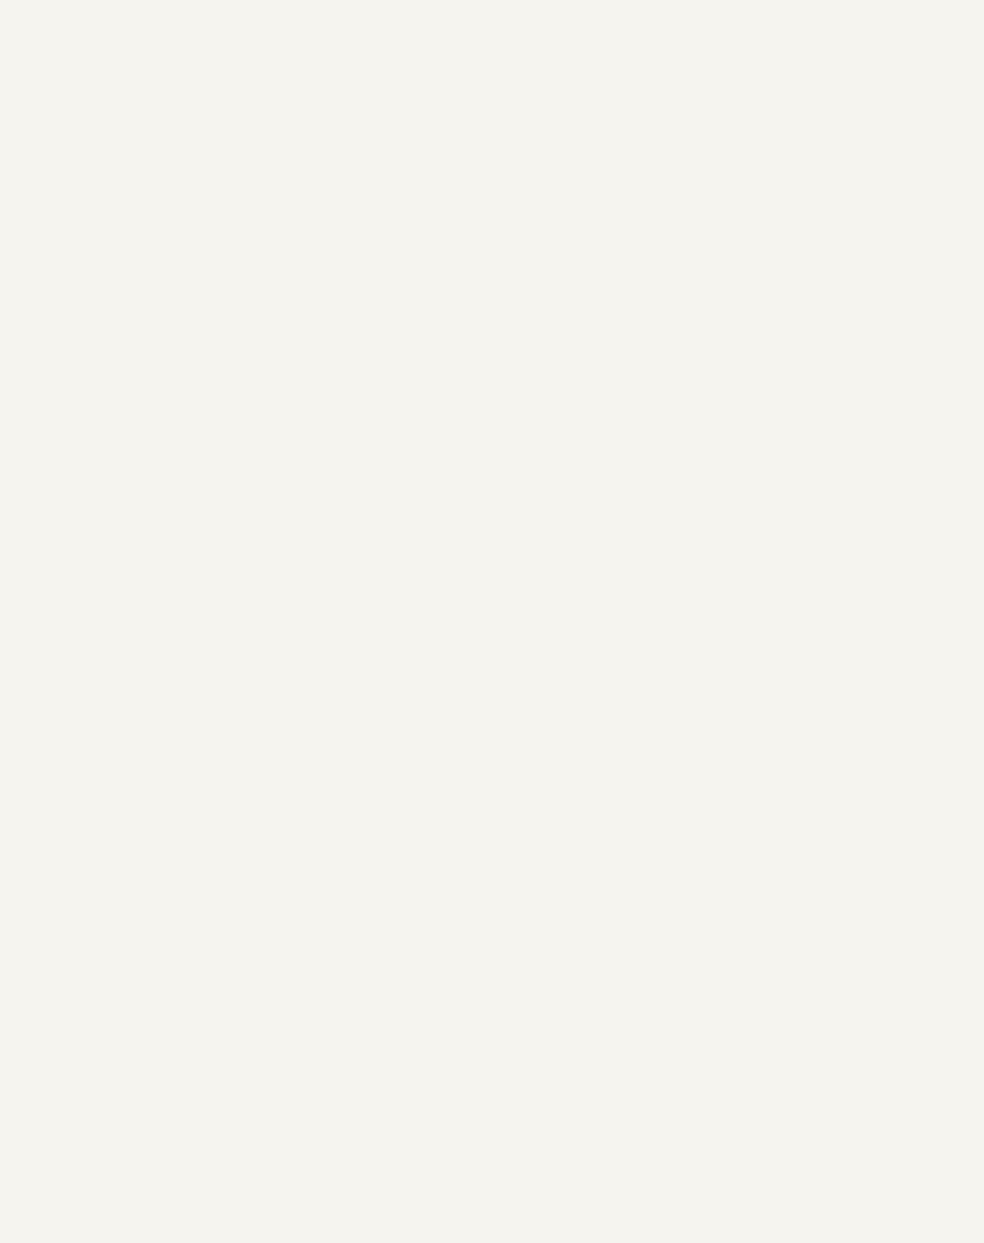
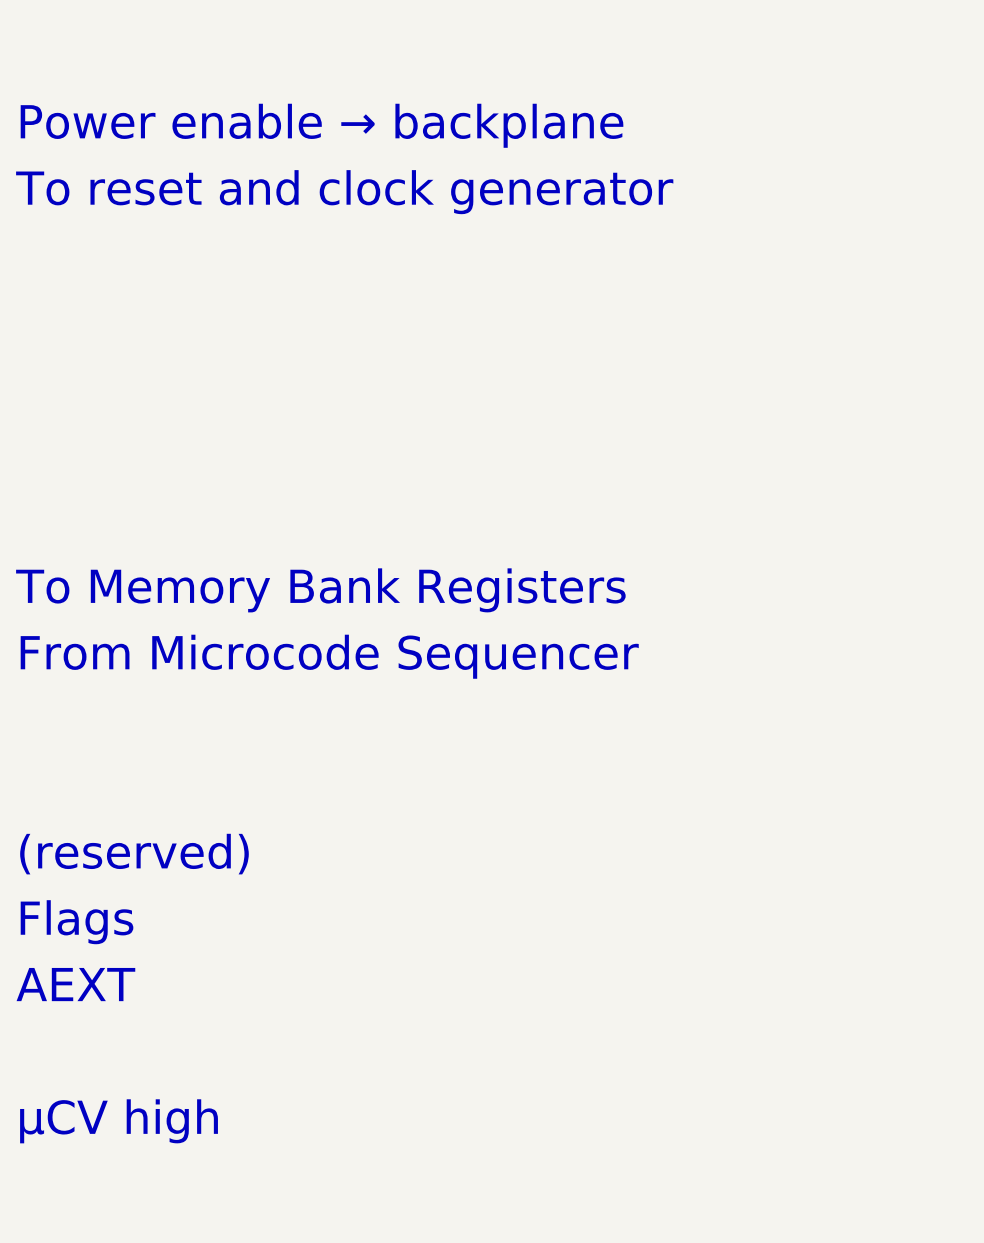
text: none -> Power enable → backplane (322, 125)
text: none -> To reset and clock generator (344, 192)
text: none -> To Memory Bank Registers (320, 590)
text: none -> From Microcode Sequencer (329, 656)
text: none -> (reserved) (134, 854)
text: none -> Flags (77, 922)
text: none -> AEXT (75, 984)
text: none -> µCV high (119, 1121)

